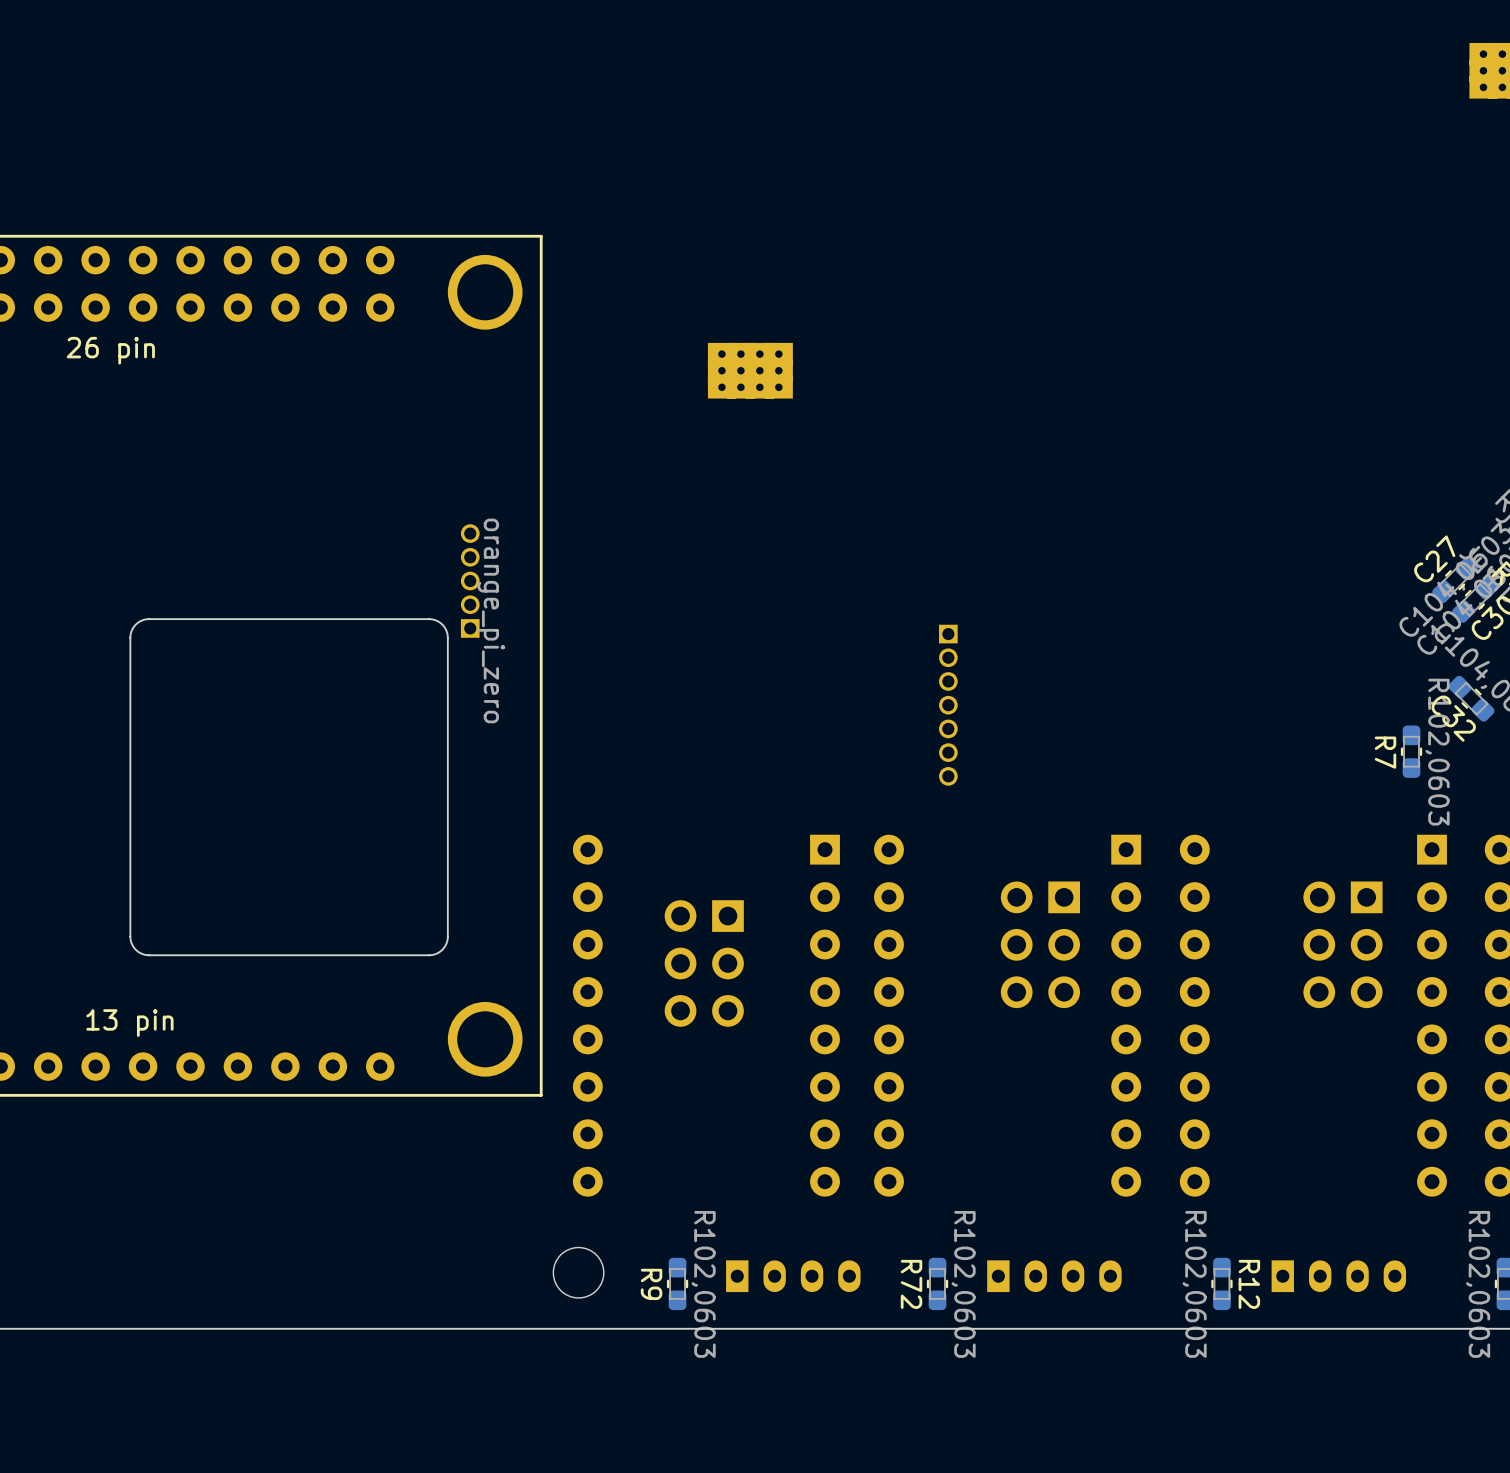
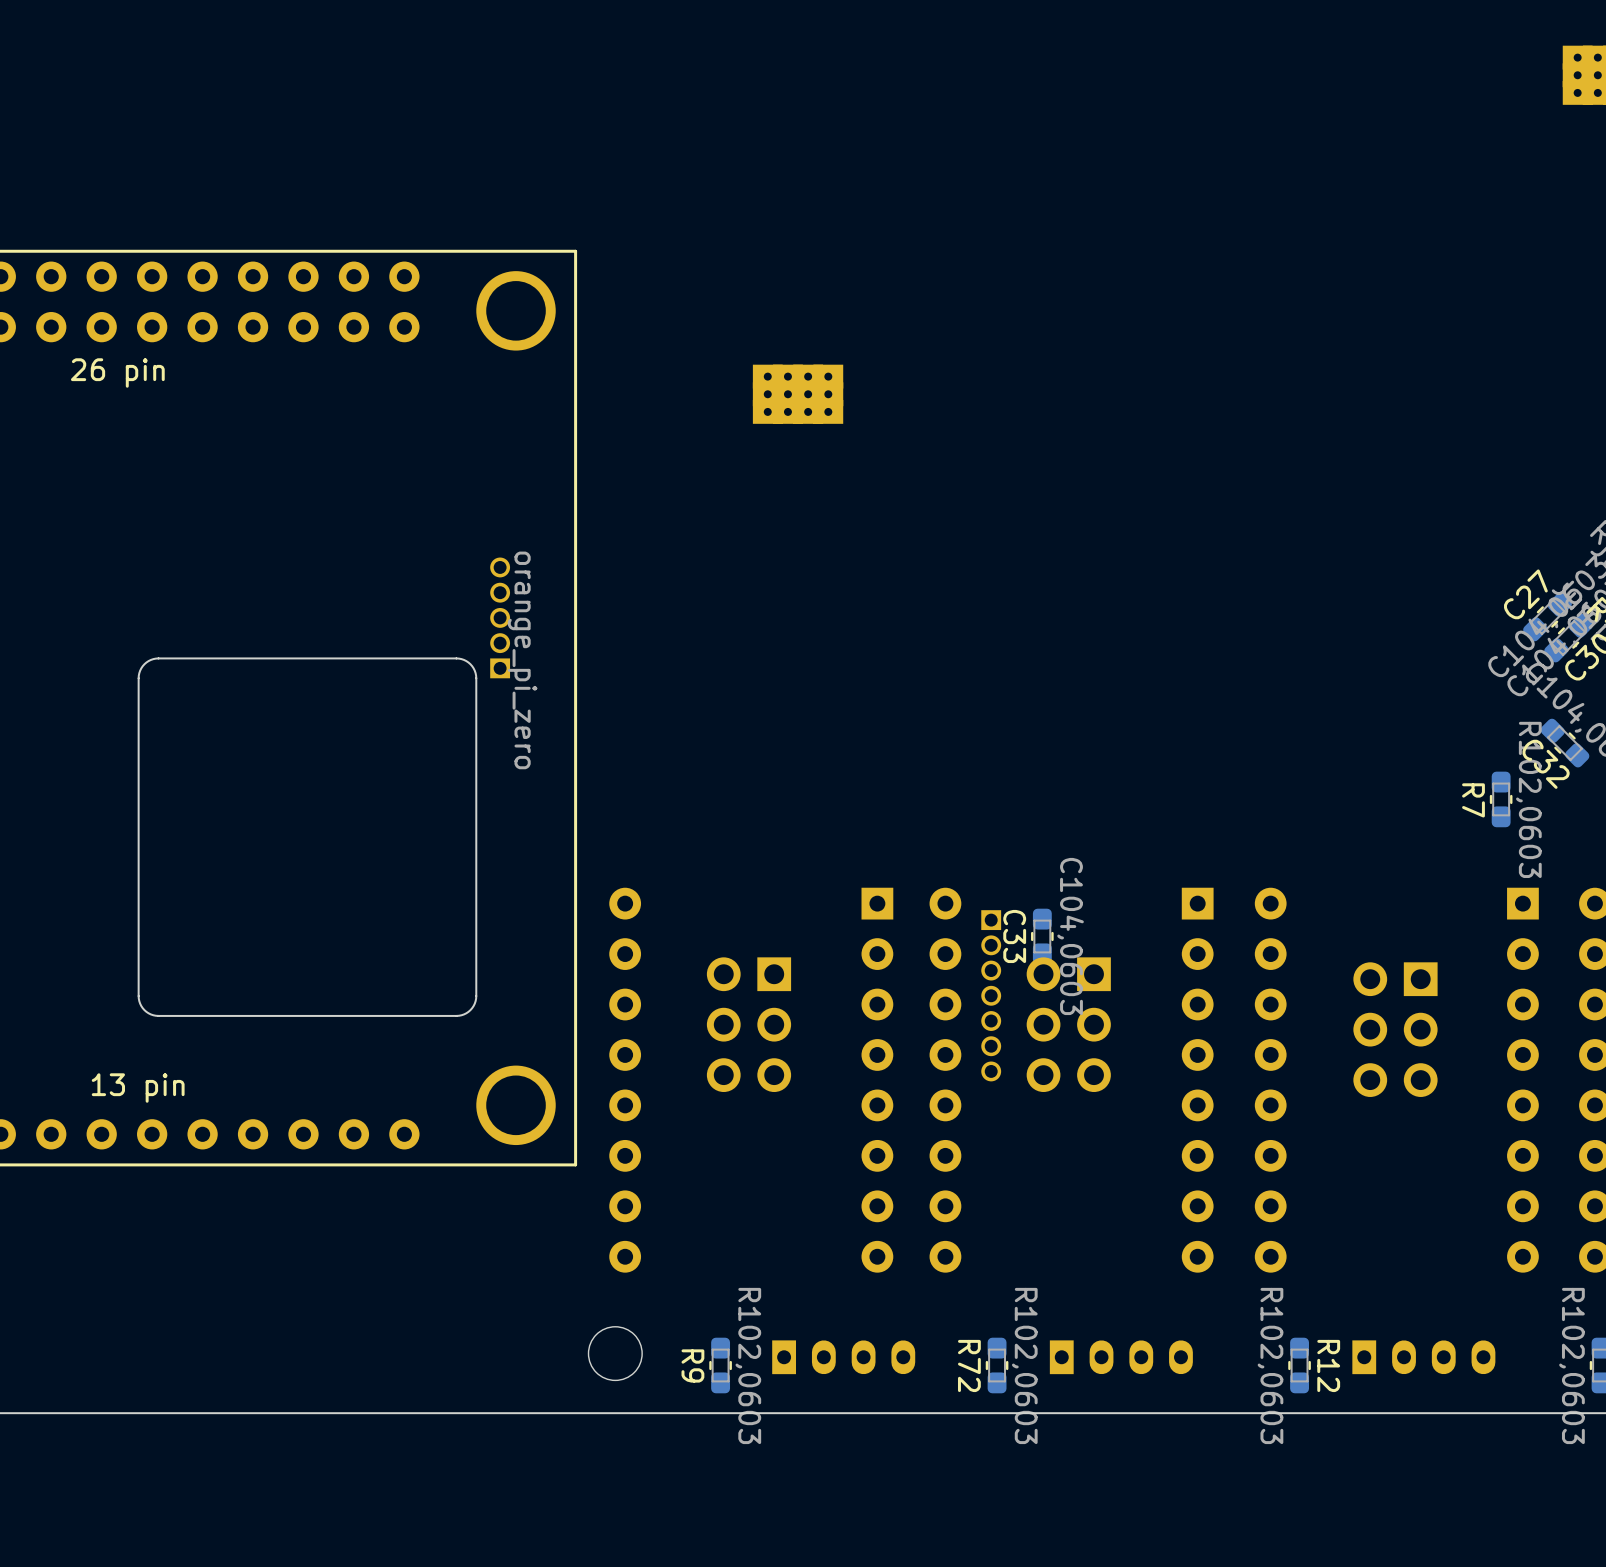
part position: (948, 705) -> (991, 995)
C33: none -> C104,0603 (1042, 936)
part position: (1040, 944) -> (1068, 1024)
part position: (1342, 944) -> (1395, 1029)

